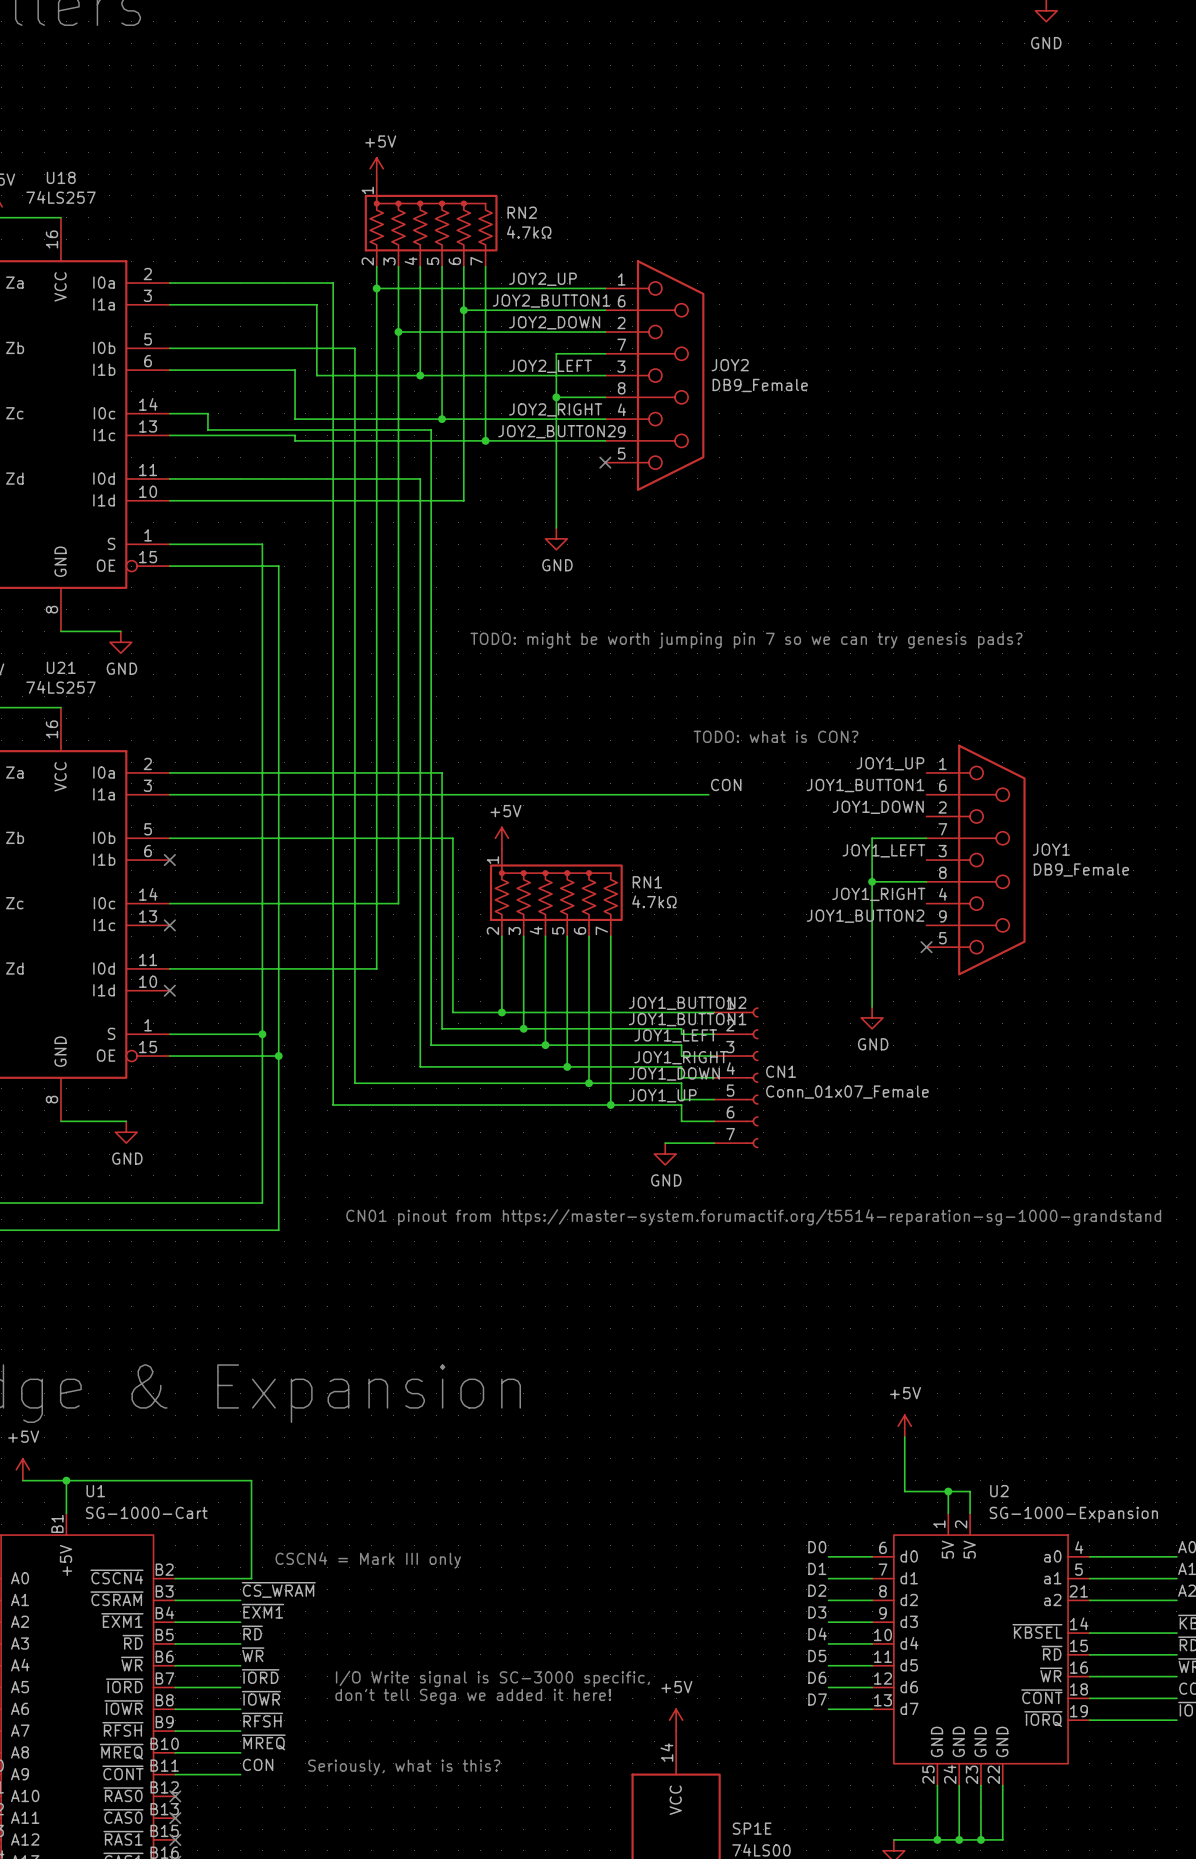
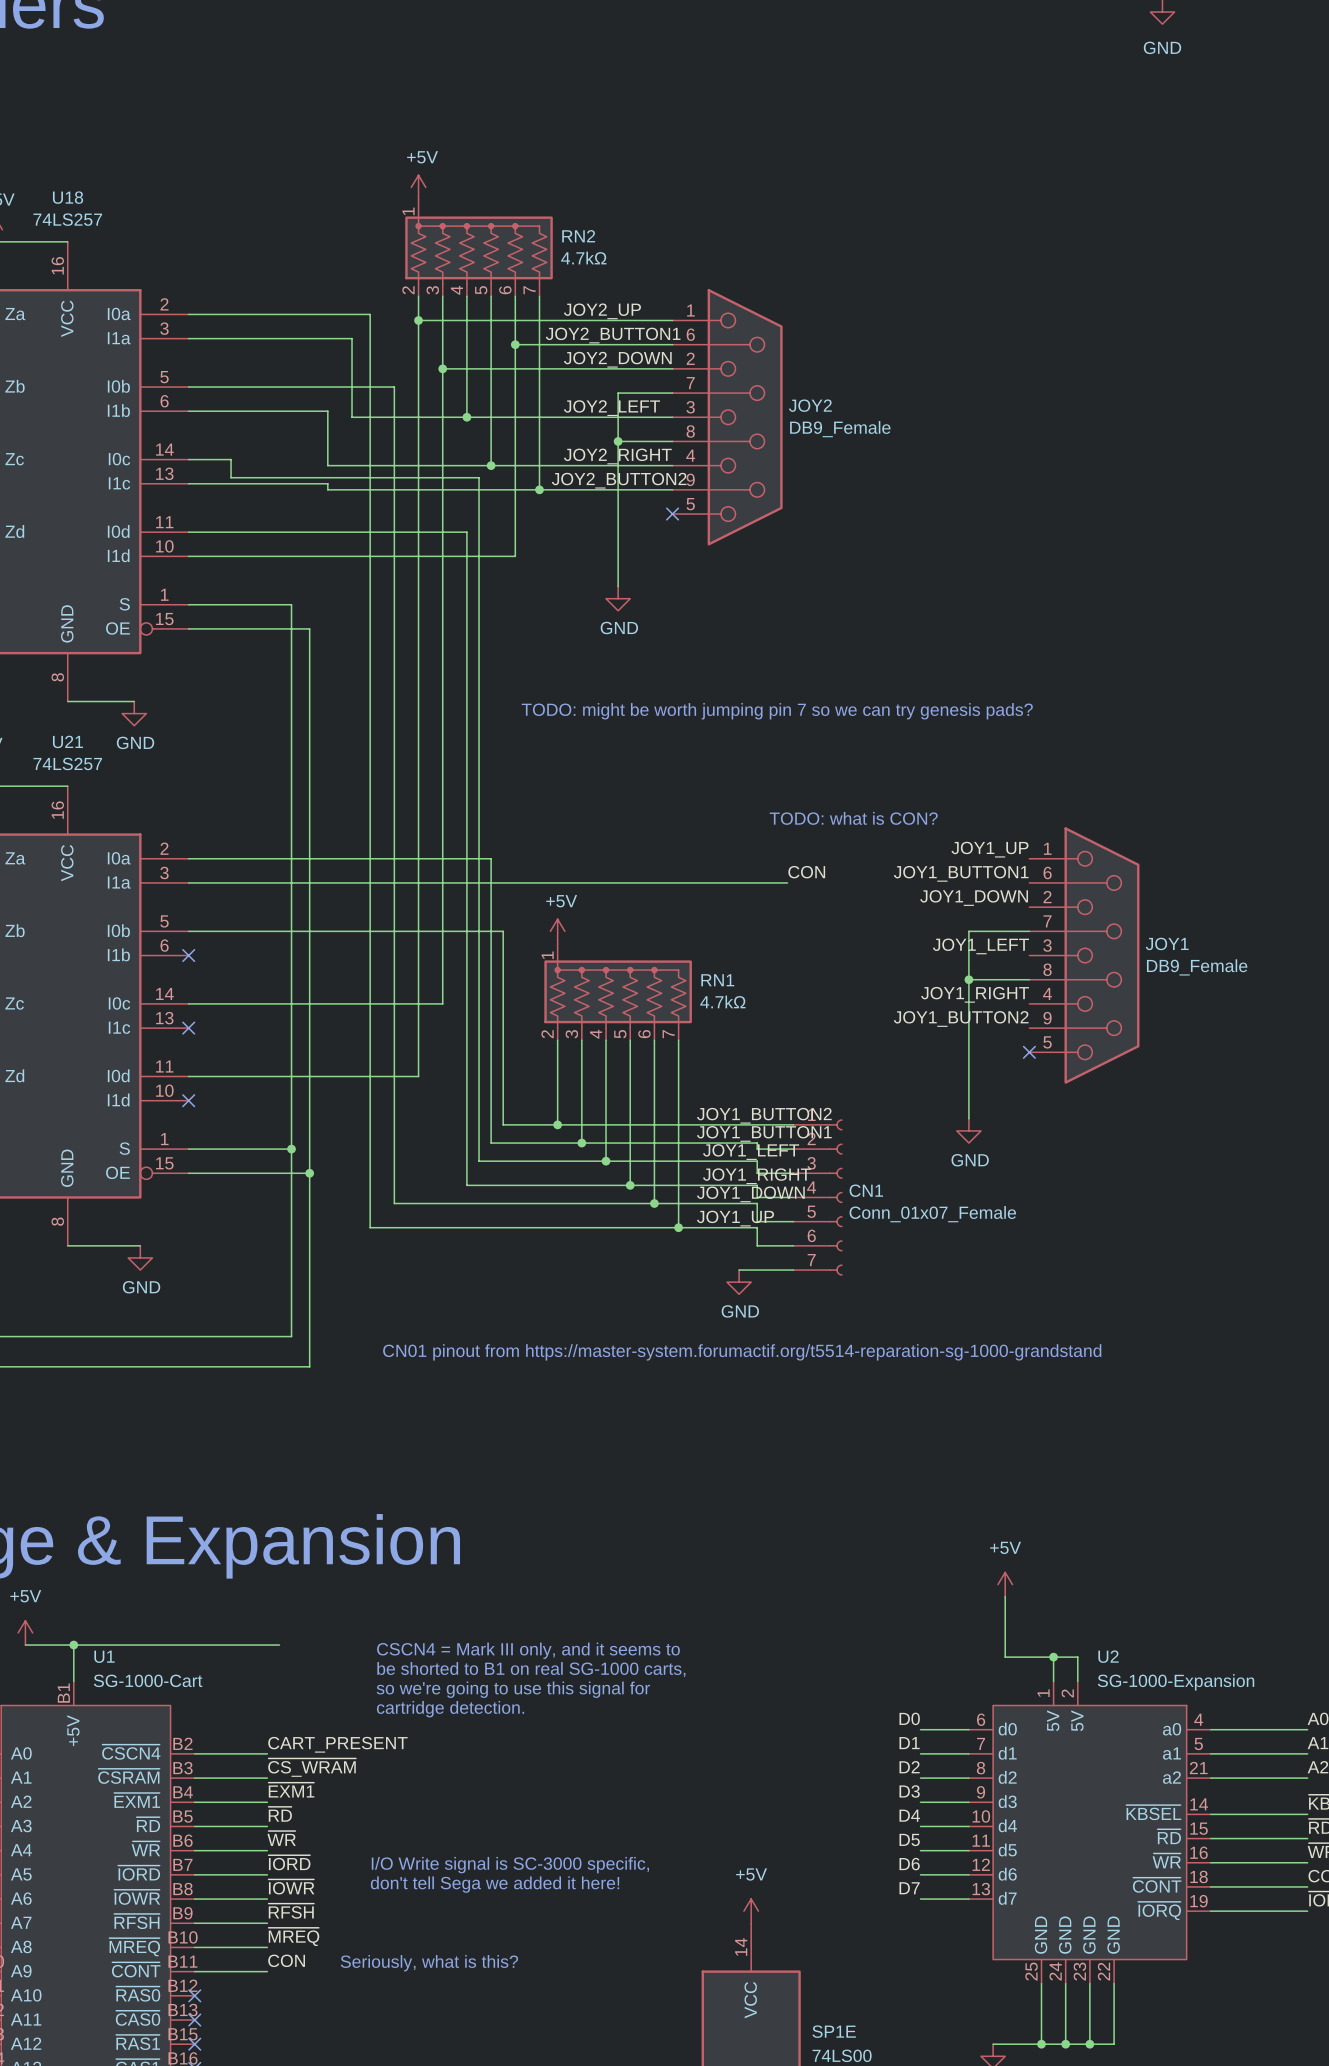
wire: (251, 1480) (251, 1578) (240, 1578) -> none
text: none -> CSCN4 = Mark III only, and it seems to (528, 1650)
text: none -> be shorted to B1 on real SG-1000 carts, (531, 1669)
text: none -> so we're going to use this signal for (513, 1689)
text: none -> cartridge detection. (450, 1709)
text: CSCN4 = Mark III only (368, 1560) -> none
label: none -> CART_PRESENT (337, 1744)

